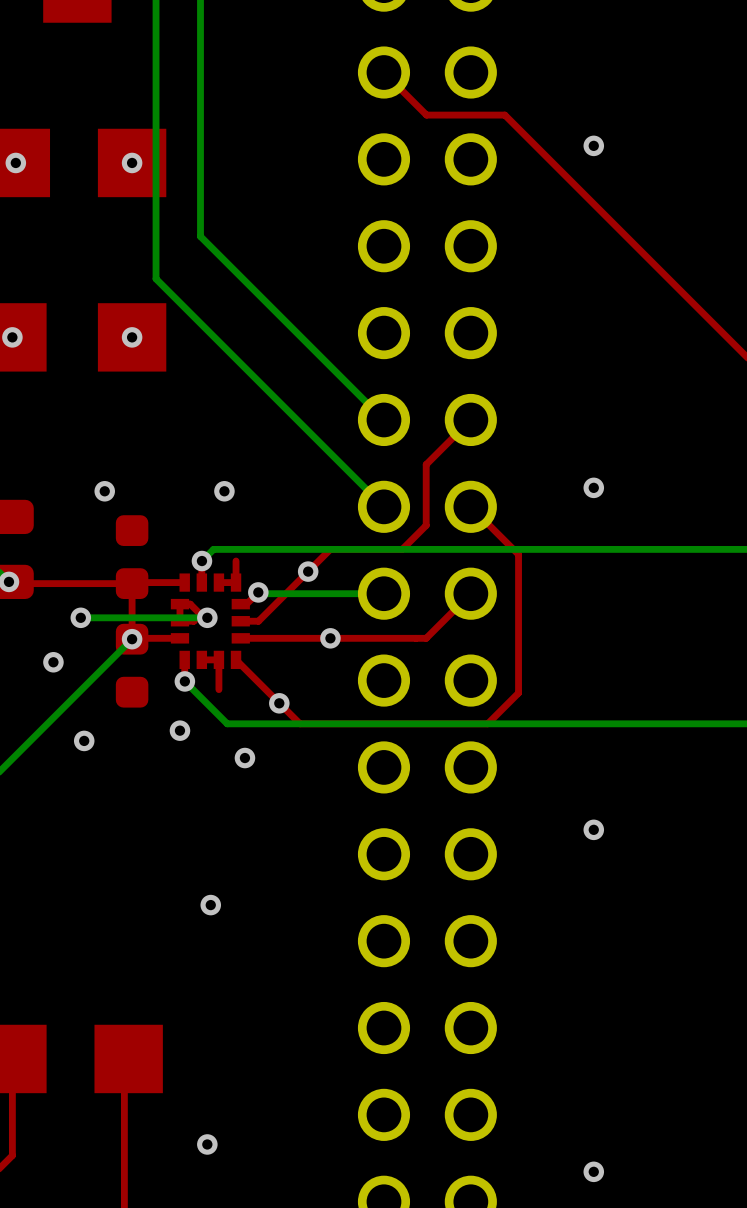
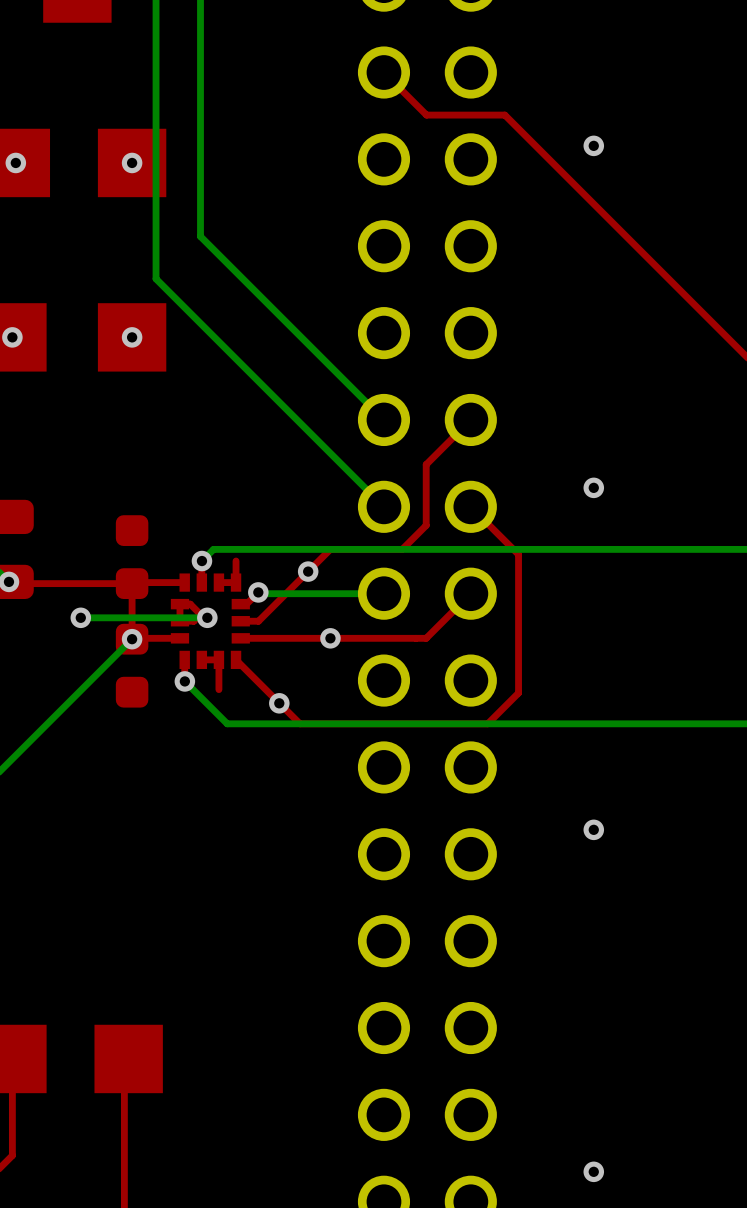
via: (104, 491) -> none
via: (224, 491) -> none
via: (53, 662) -> none
via: (179, 730) -> none
via: (84, 740) -> none
via: (244, 758) -> none
via: (210, 905) -> none
via: (207, 1144) -> none

